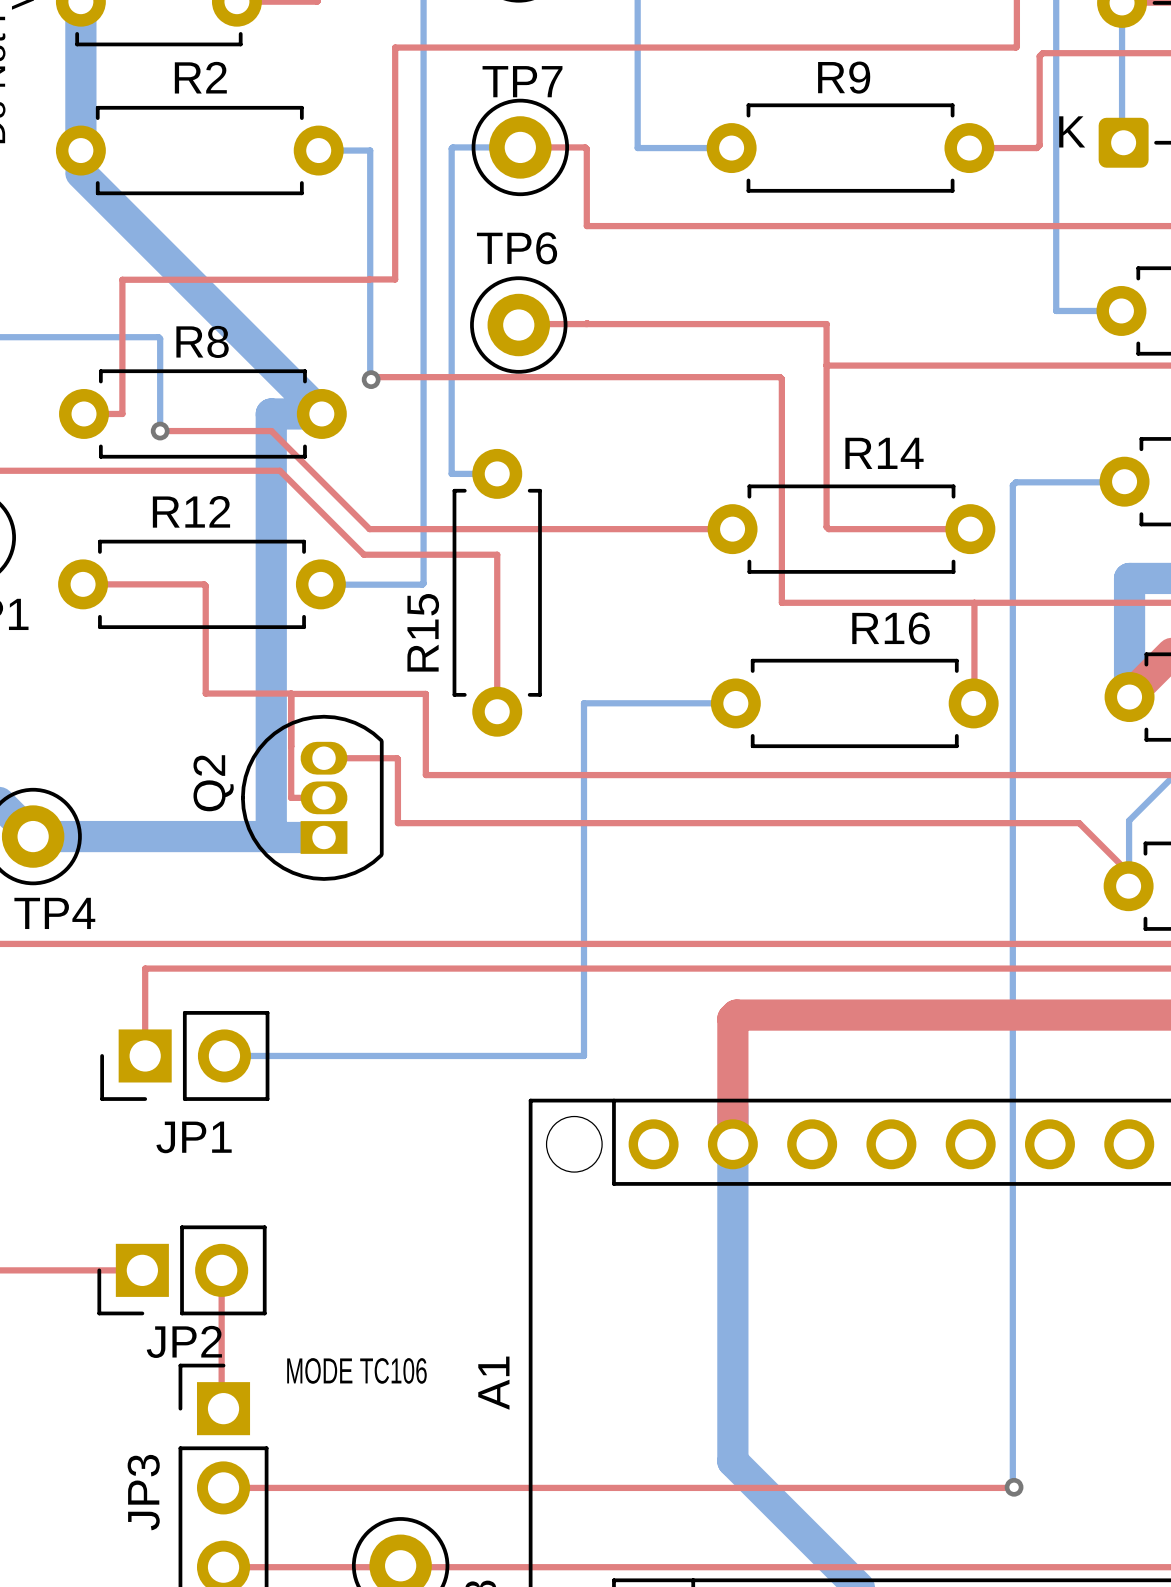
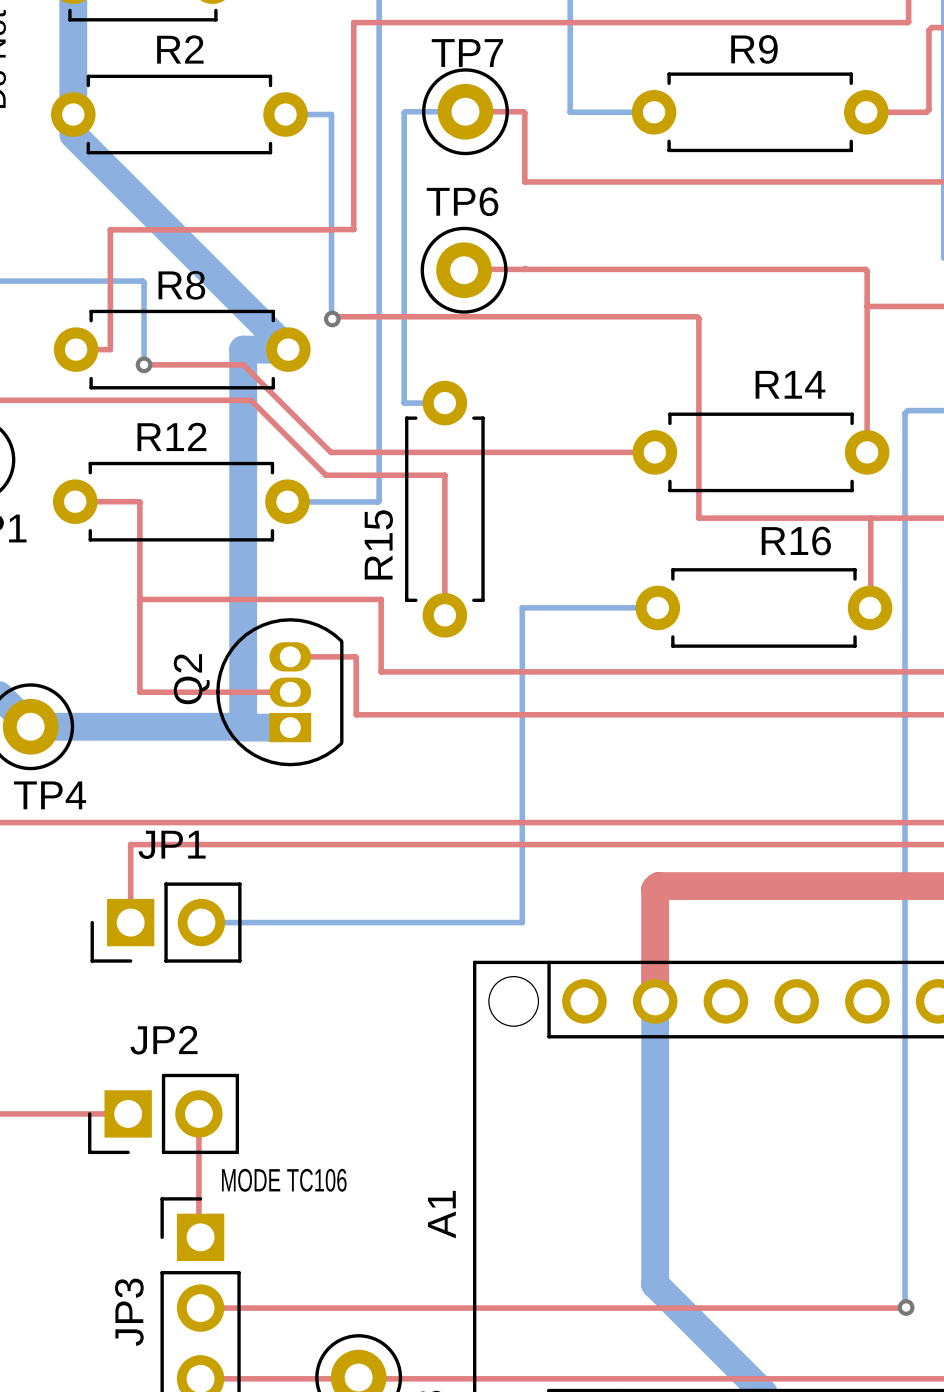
top track: (826, 324) (826, 527) (828, 529) (970, 529) -> (867, 306) (867, 452)
top track: (826, 365) (970, 365) -> (738, 269) (865, 269) (867, 271) (867, 305)
top track: (154, 584) (204, 584) (205, 585) (205, 693) (291, 693) (291, 797) -> (139, 501) (139, 692) (260, 692)
top track: none -> (140, 599) (261, 599)
JP1 name position: JP1 (194, 1137) -> JP1 (172, 844)
JP2 name position: JP2 (184, 1341) -> JP2 (163, 1040)
text position: MODE TC106 (356, 1370) -> MODE TC106 (284, 1180)

